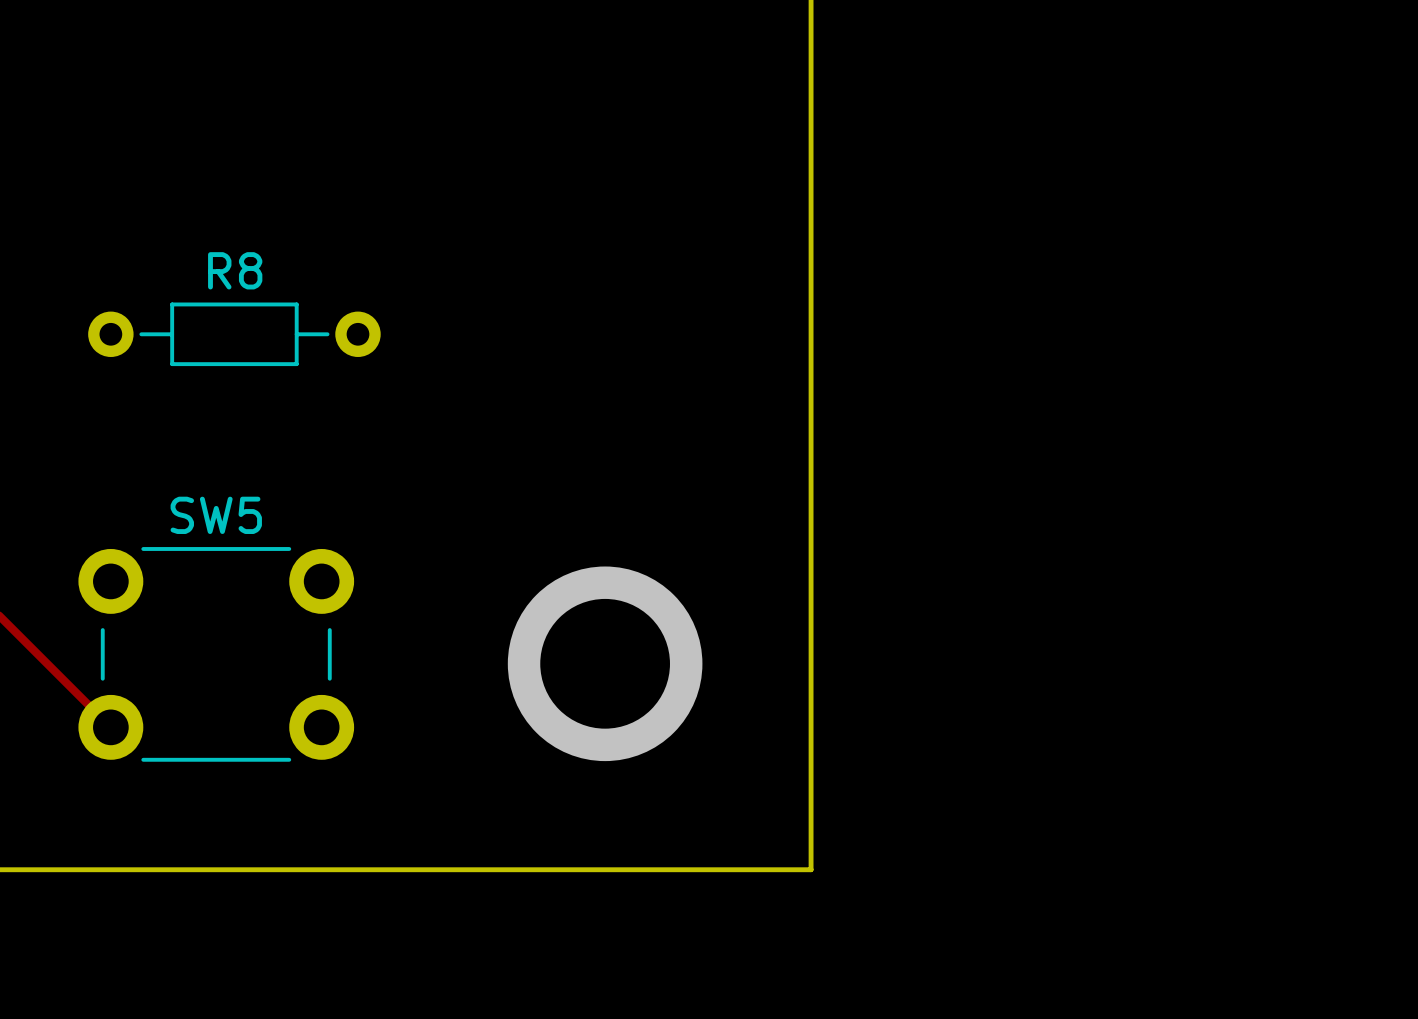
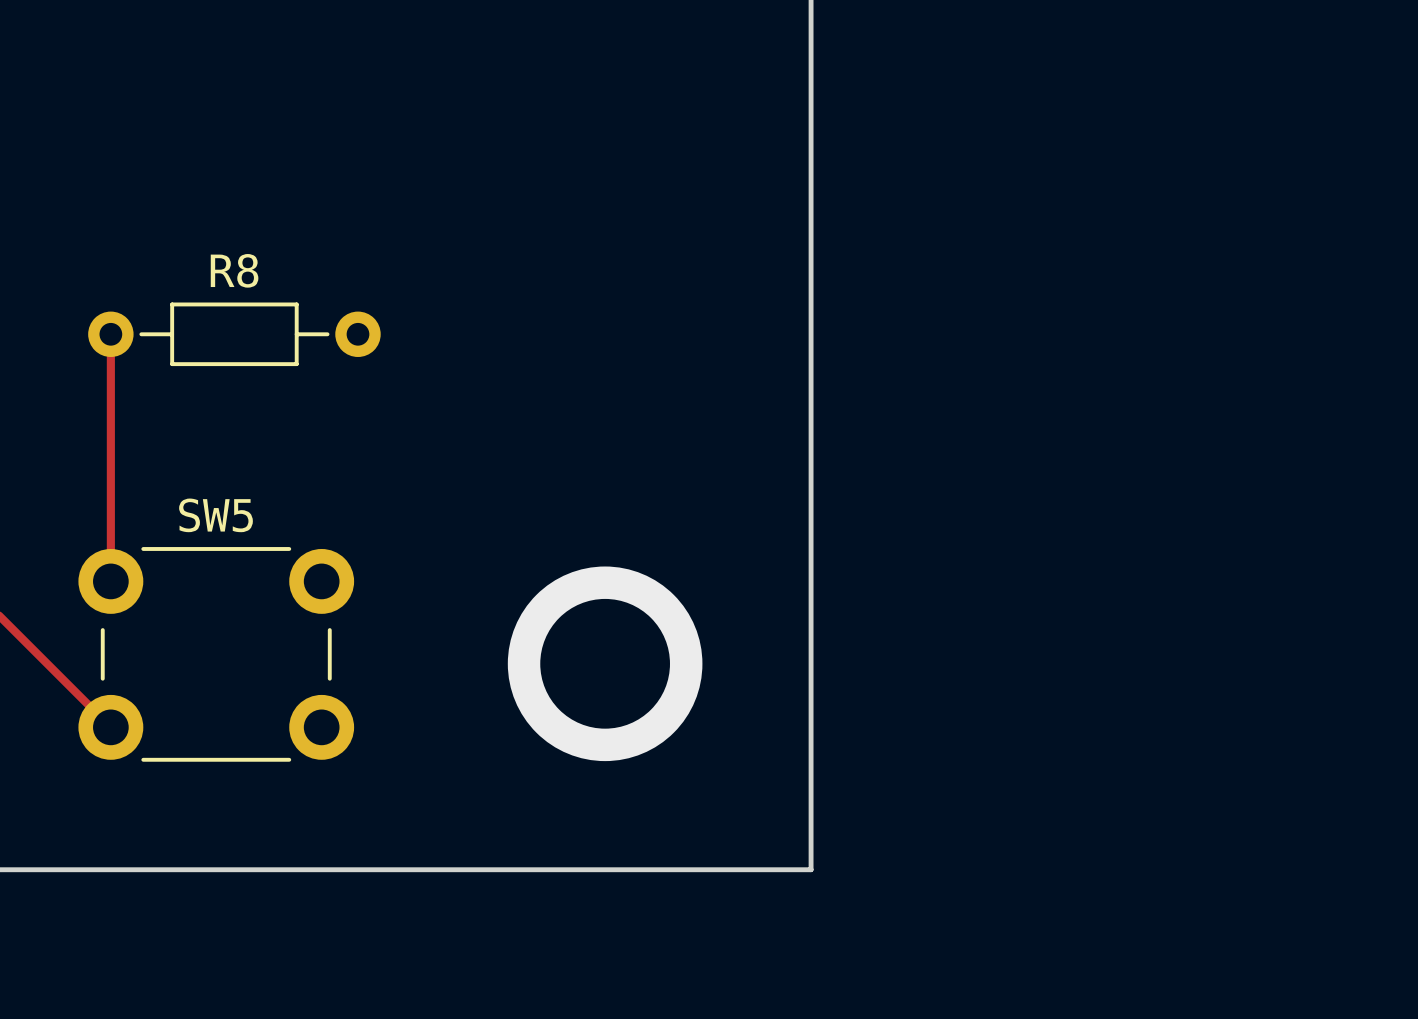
track: none -> (110, 334) (110, 581)

